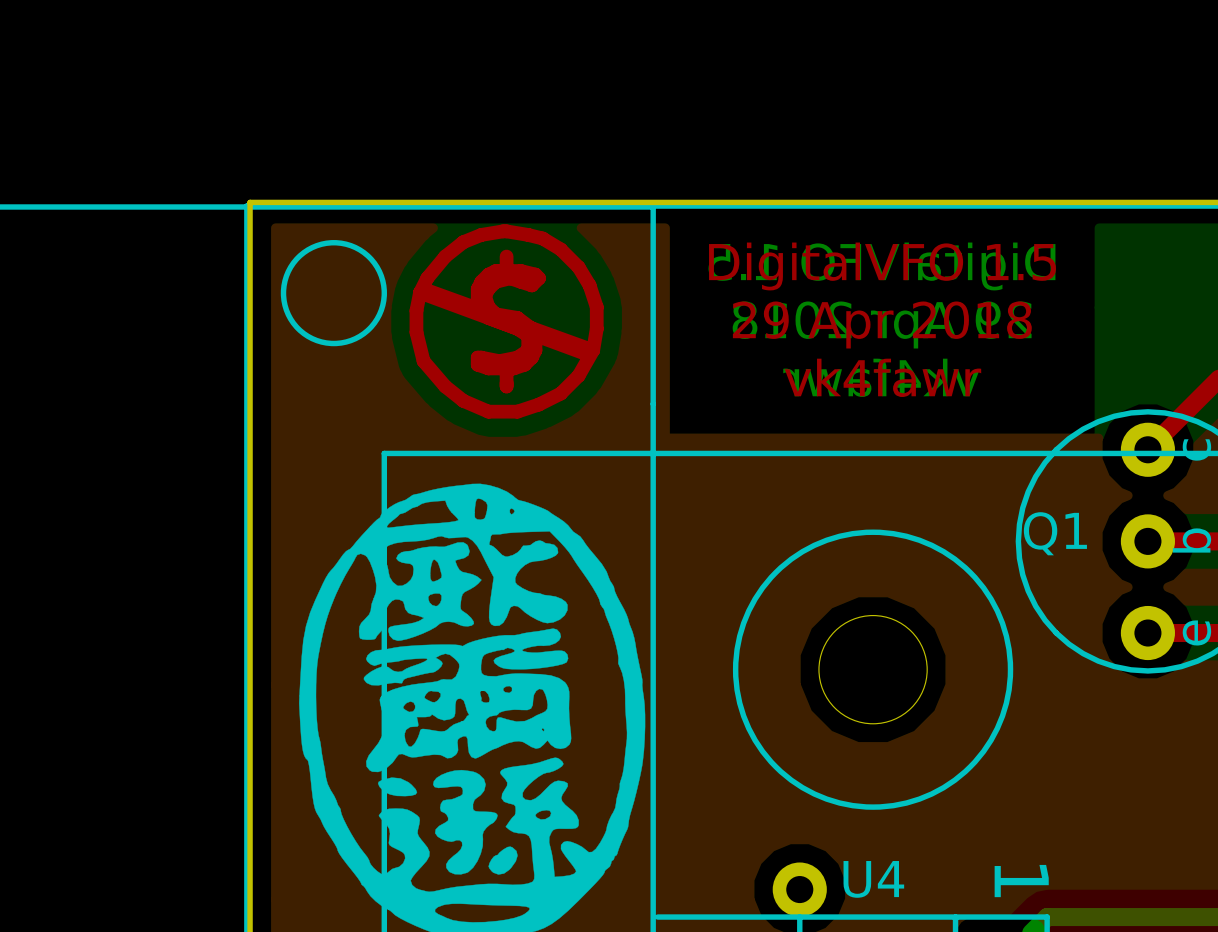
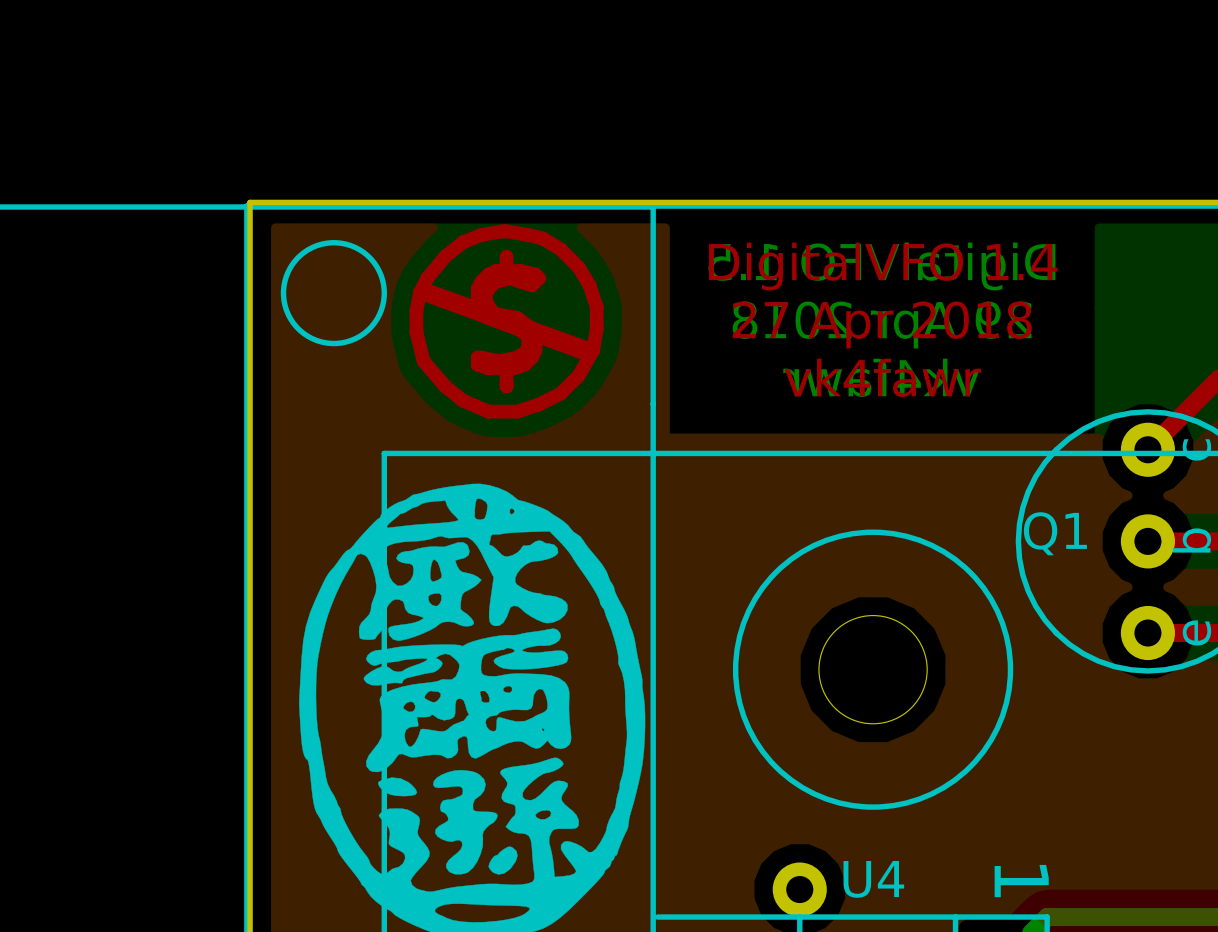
text: DigitalVFO 1.5 (882, 266) -> DigitalVFO 1.4 (883, 266)
text: 29 Apr 2018 (882, 324) -> 27 Apr 2018 (882, 324)

